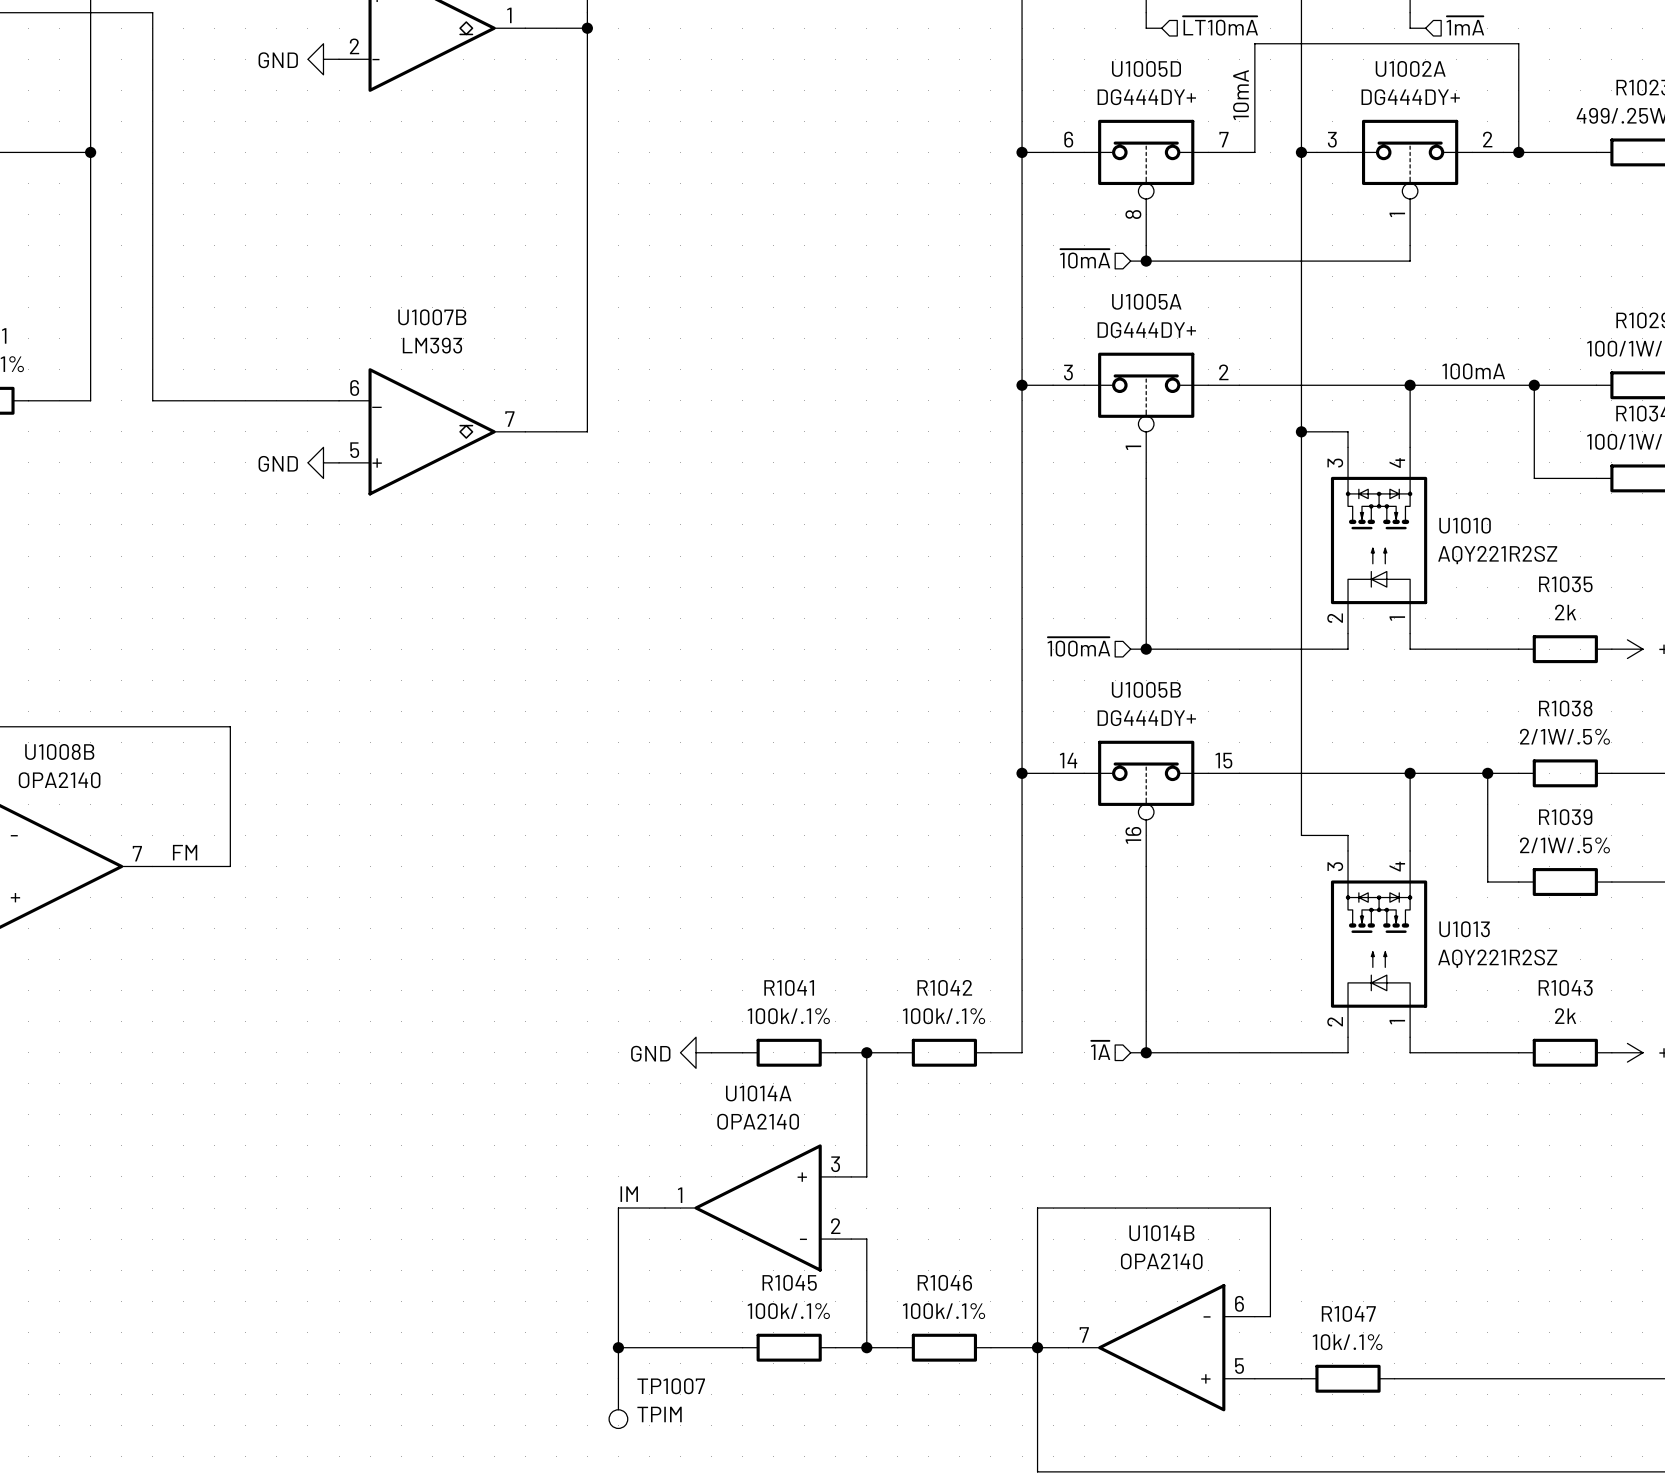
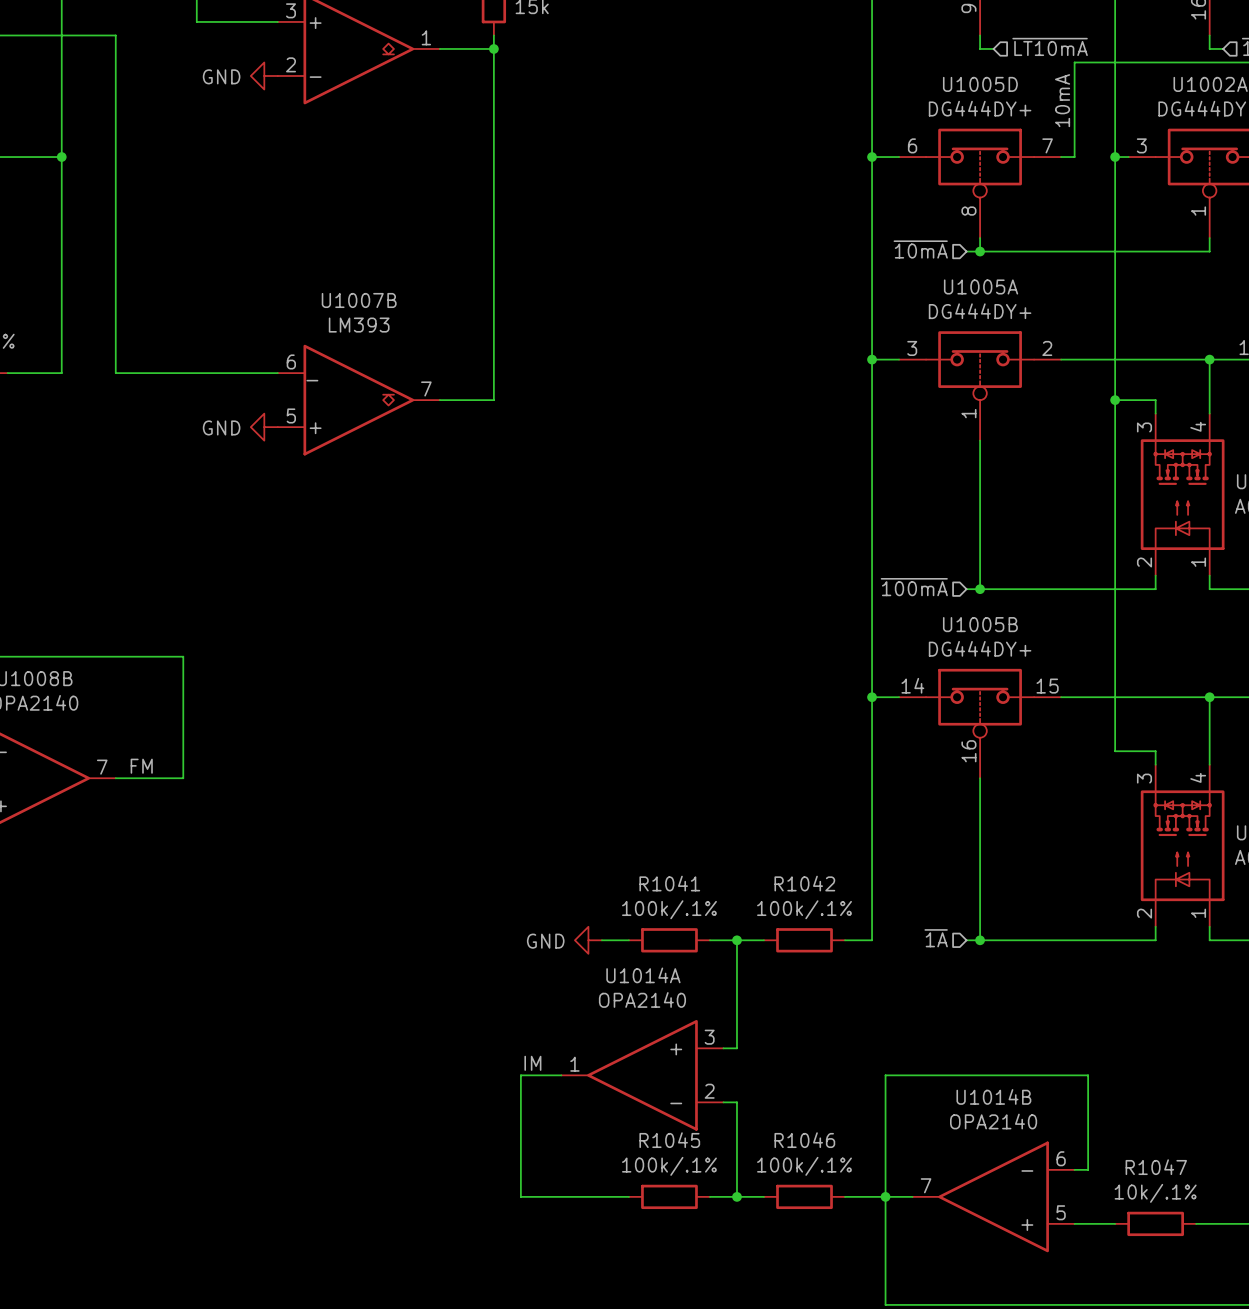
wire: (618, 1347) (618, 1378) -> none
junction: (618, 1347) -> none
TP1007: TPIM (618, 1403) -> none

